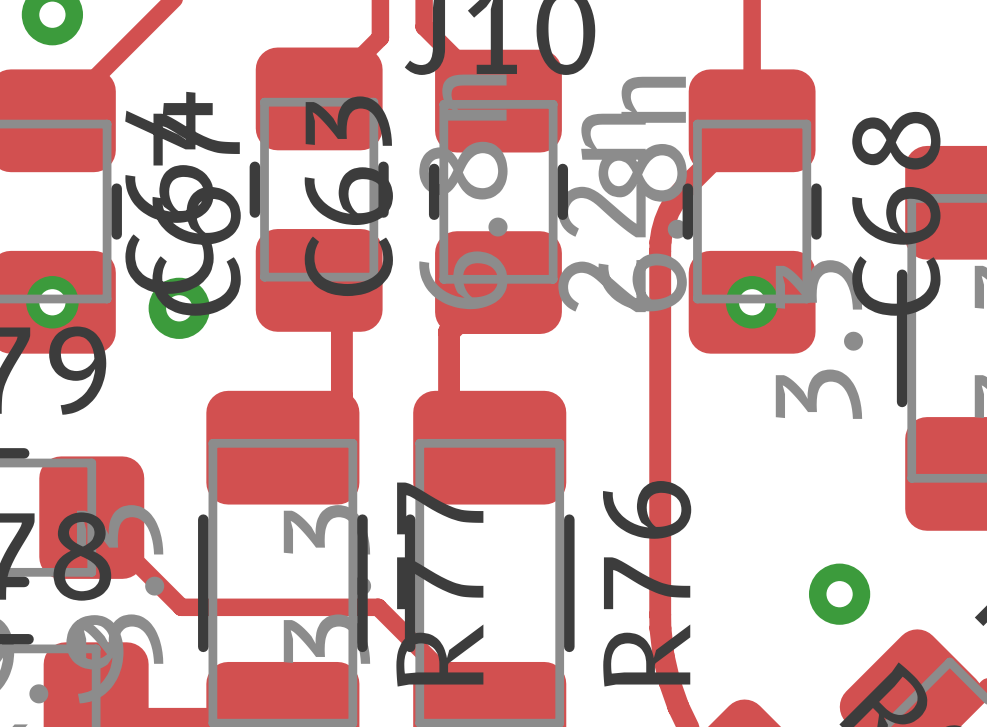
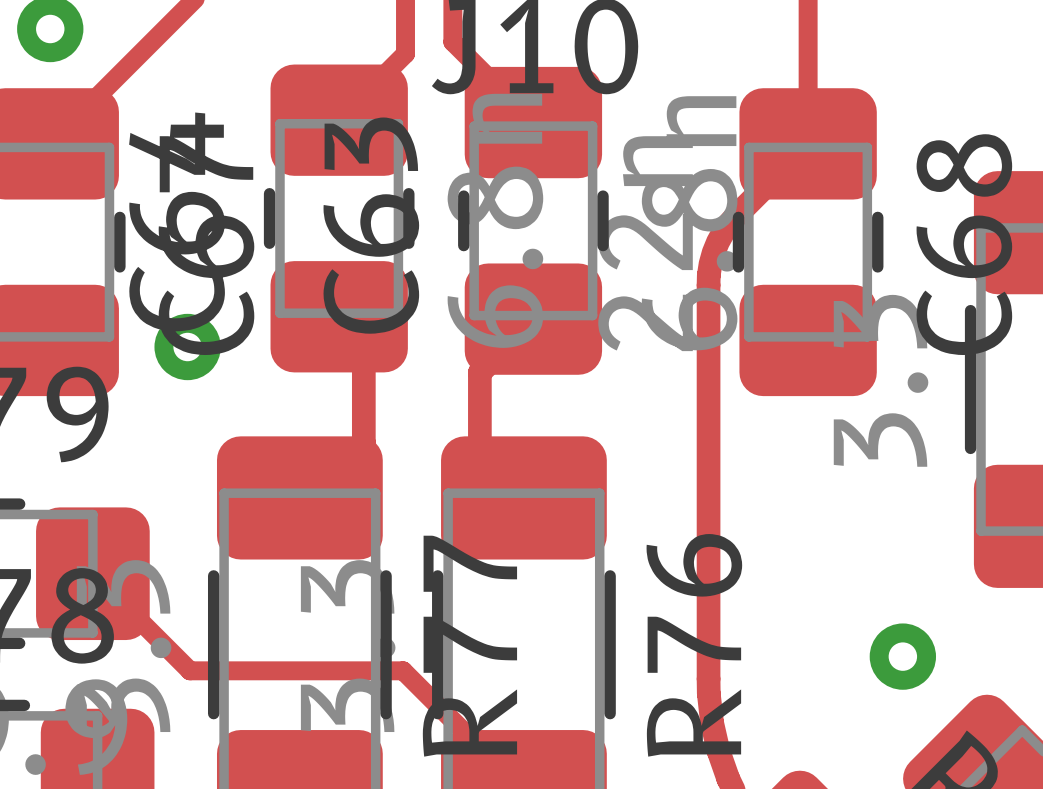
via: (52, 302) -> none
via: (752, 302) -> none

